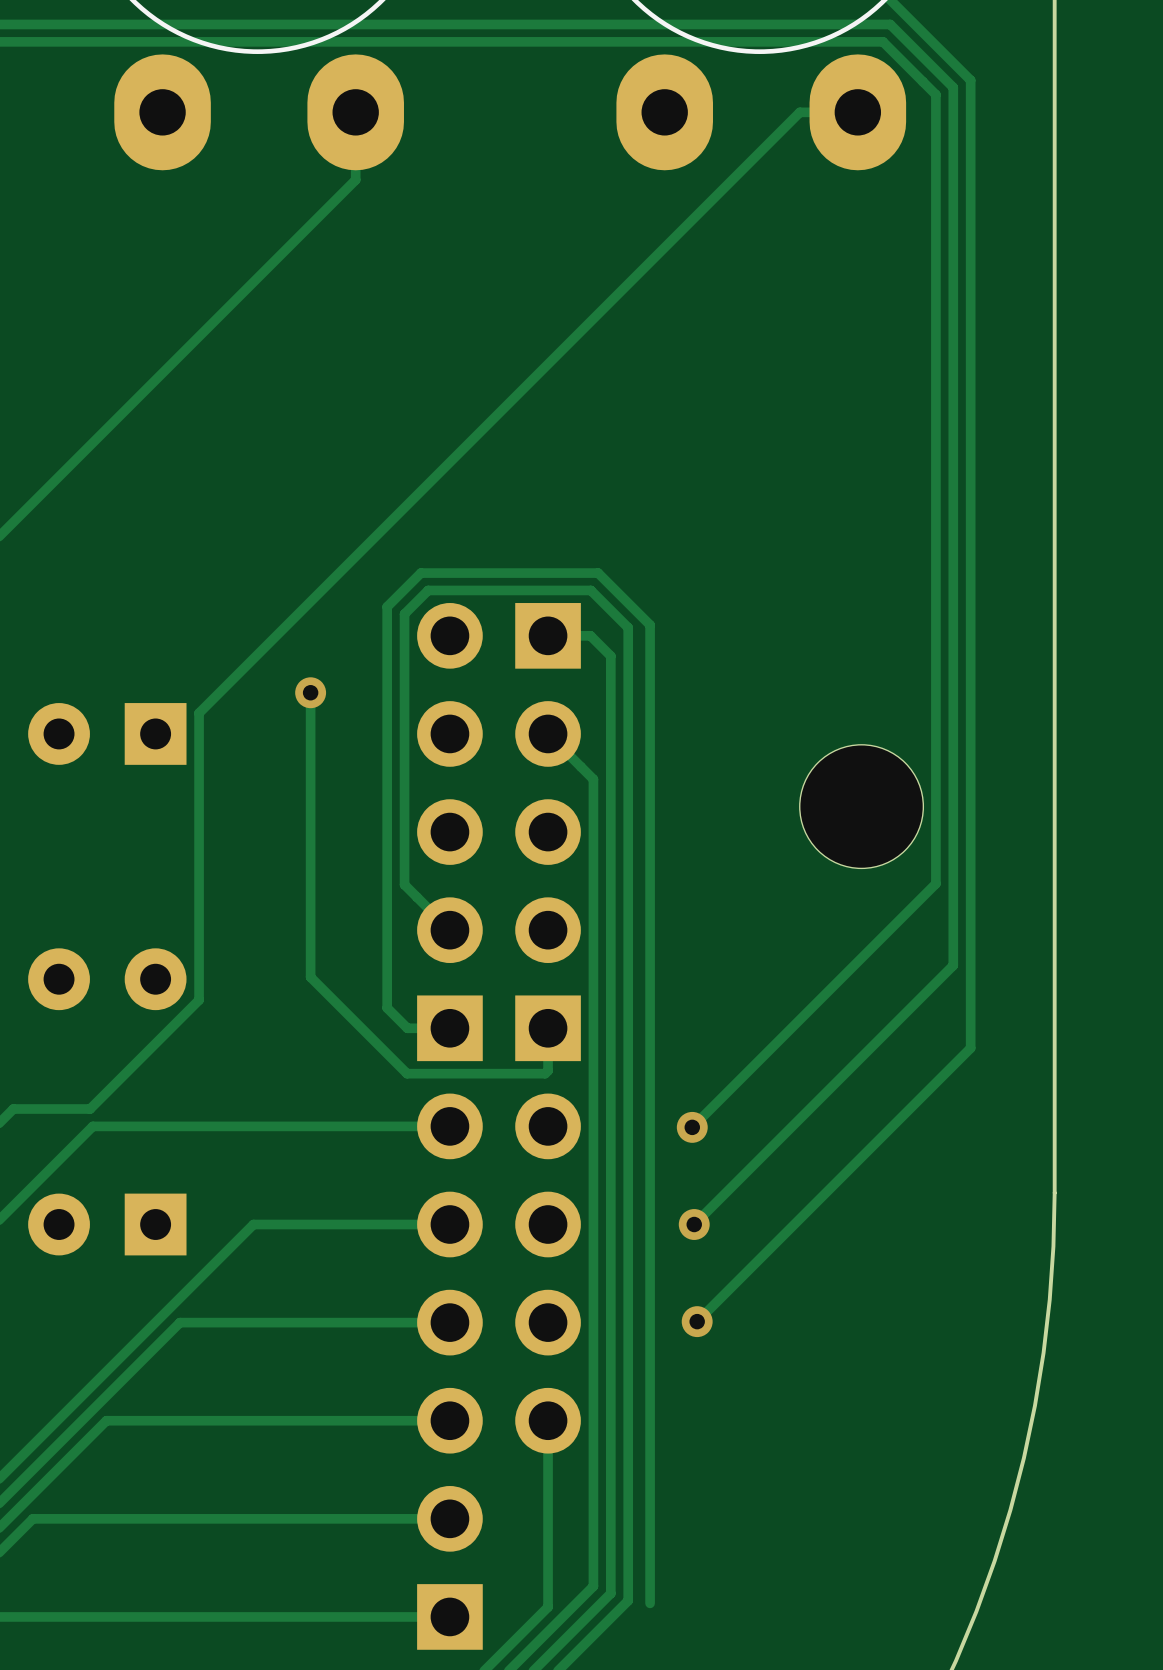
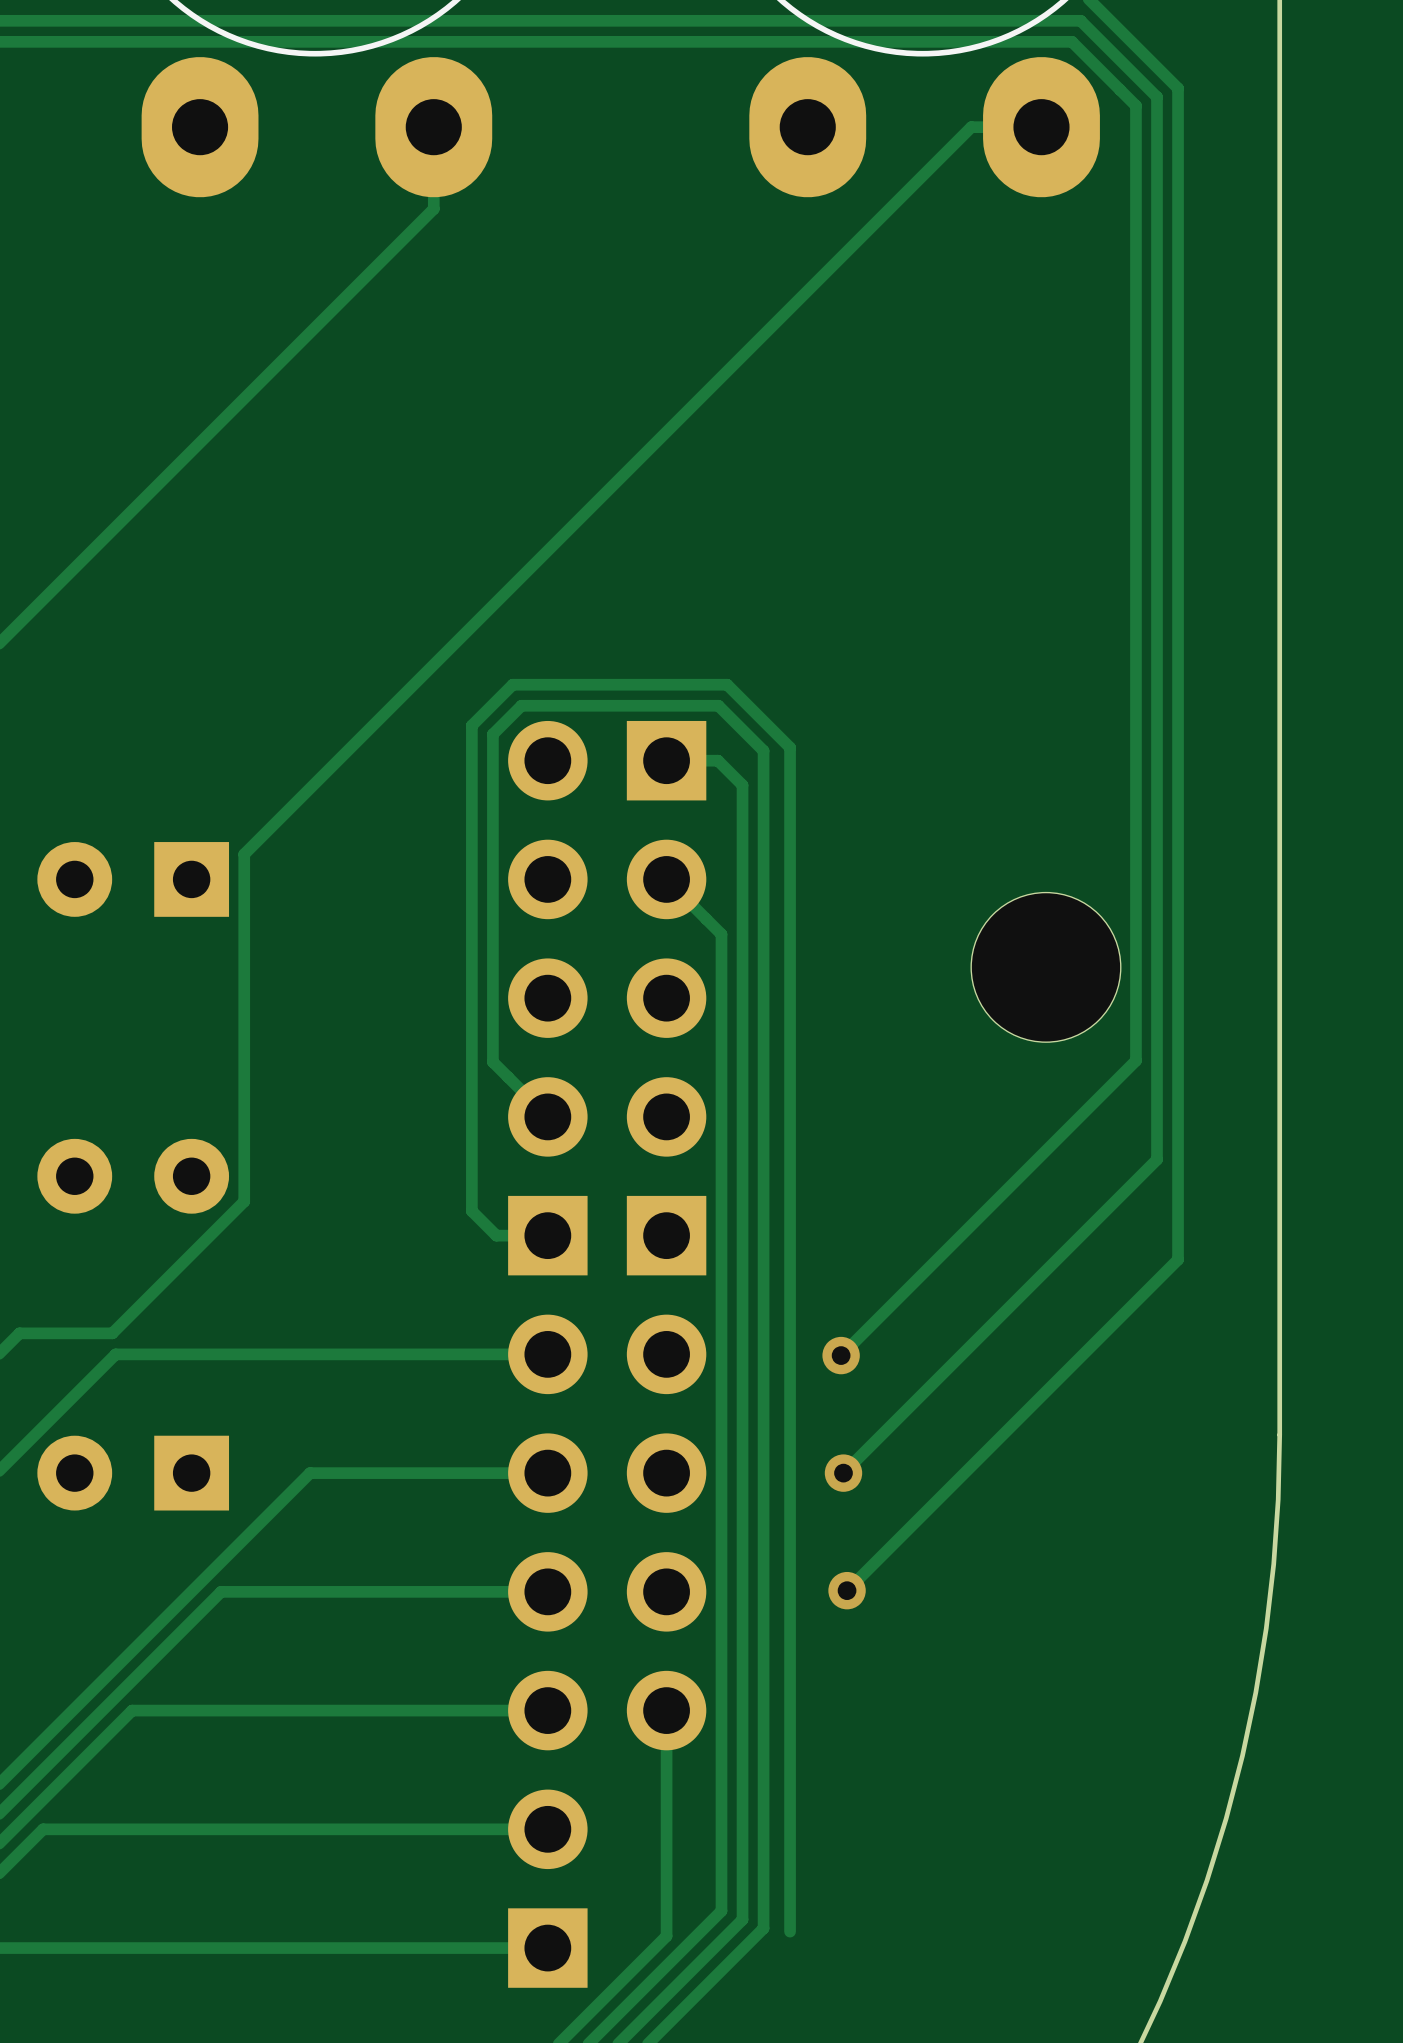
track: (310, 692) (310, 977) (407, 1073) (545, 1073) (548, 1070) (548, 1028) -> none
via: (310, 692) -> none

